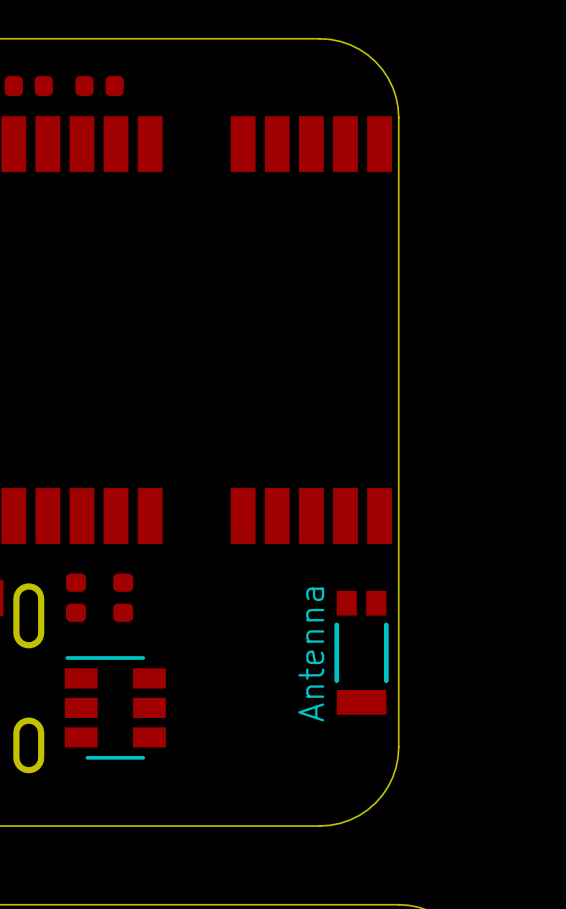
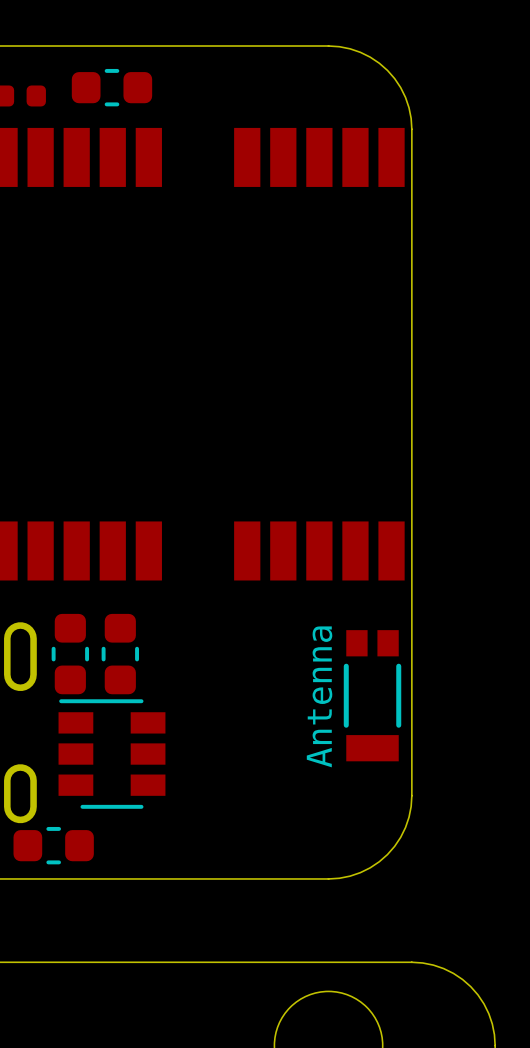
part footprint: [75, 76, 124, 96] -> [71, 68, 153, 107]
part footprint: [66, 573, 86, 622] -> [51, 613, 90, 695]
part footprint: [113, 573, 134, 622] -> [101, 613, 140, 695]
part: none -> (53, 845)

